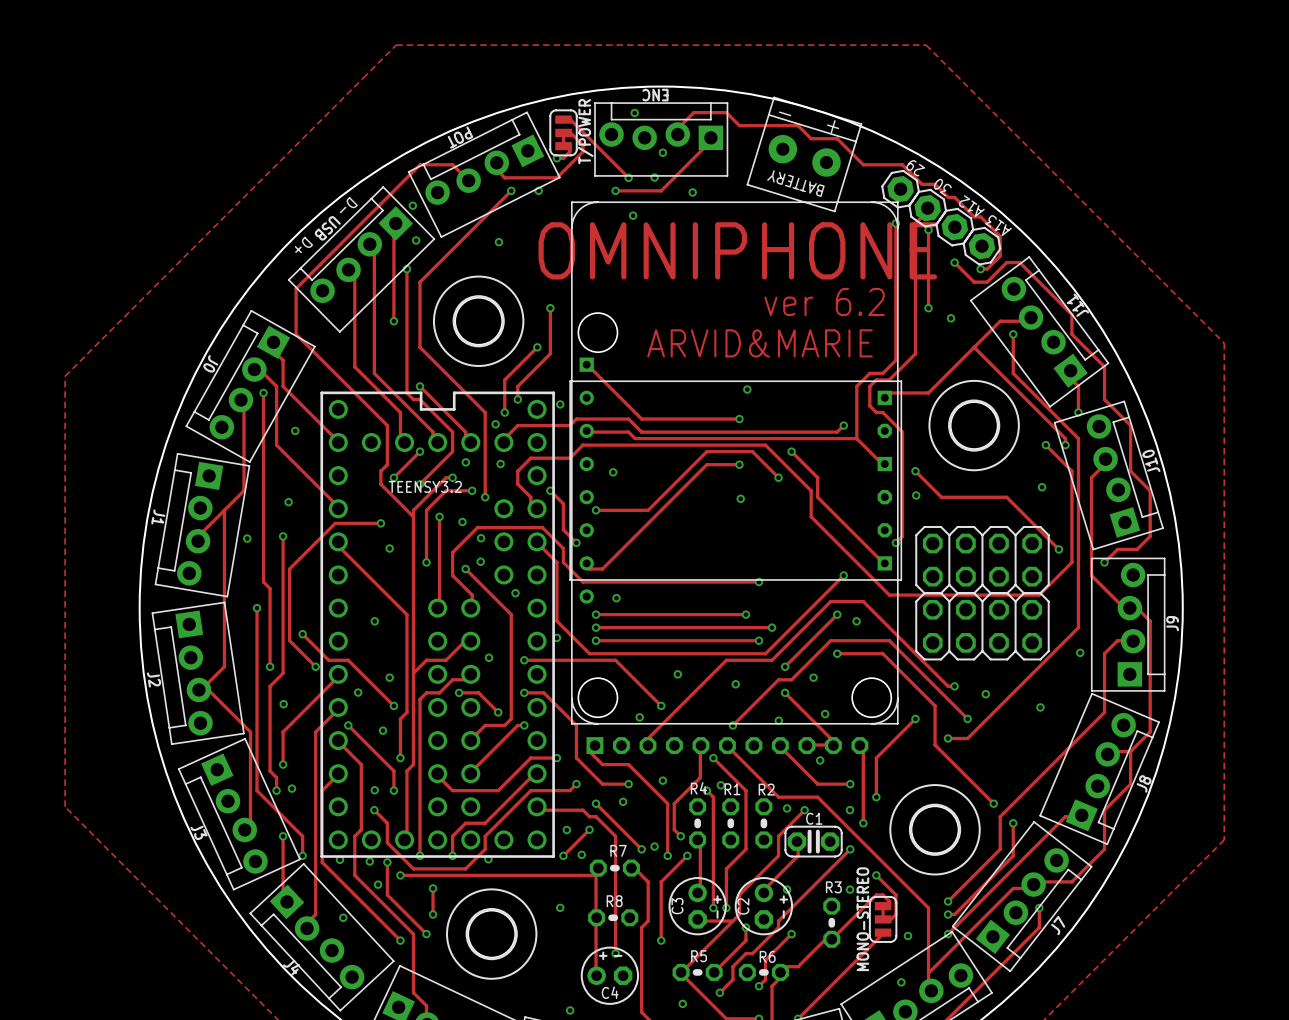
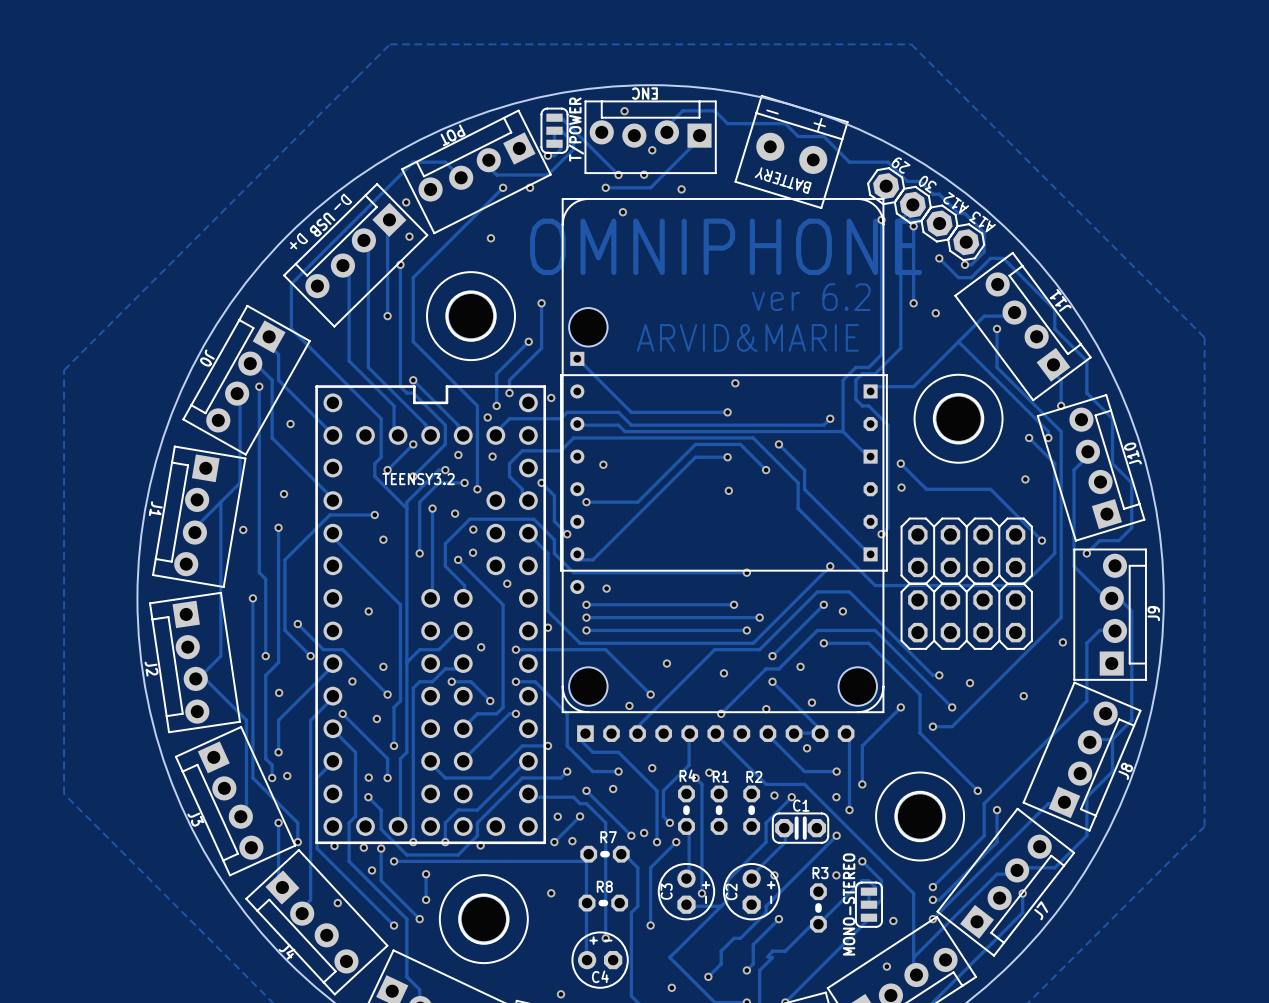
track: (713, 758) (745, 790) (745, 849) (726, 868) (726, 908) -> none
via: (713, 758) -> none
via: (726, 908) -> none
track: (745, 927) (745, 940) (714, 972) -> none
via: (745, 927) -> none
R5: (697, 972) -> none
R6: (763, 972) -> none

